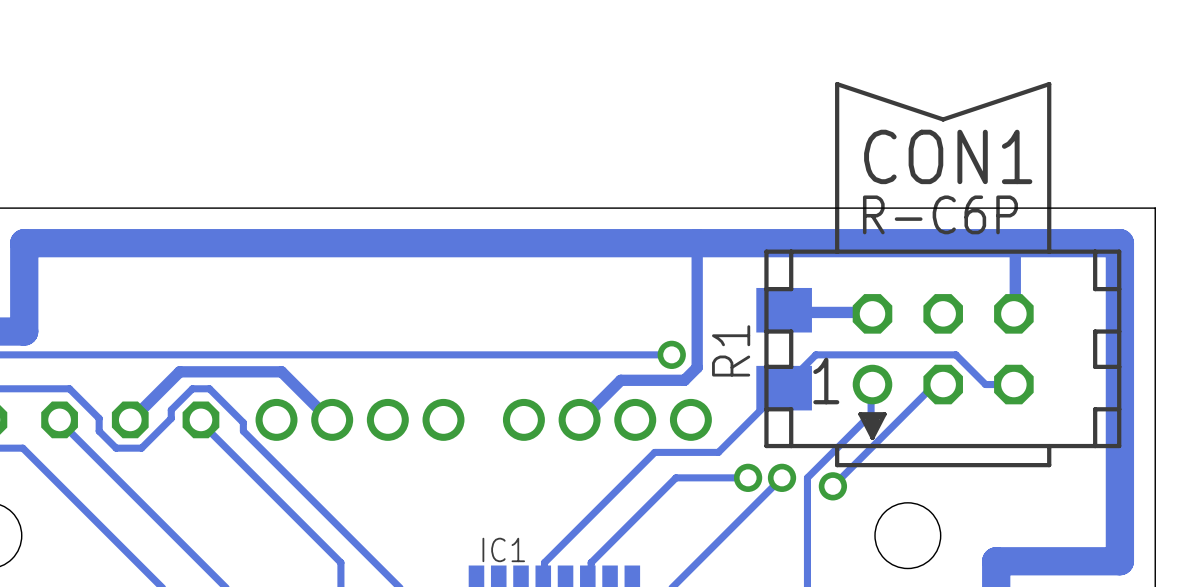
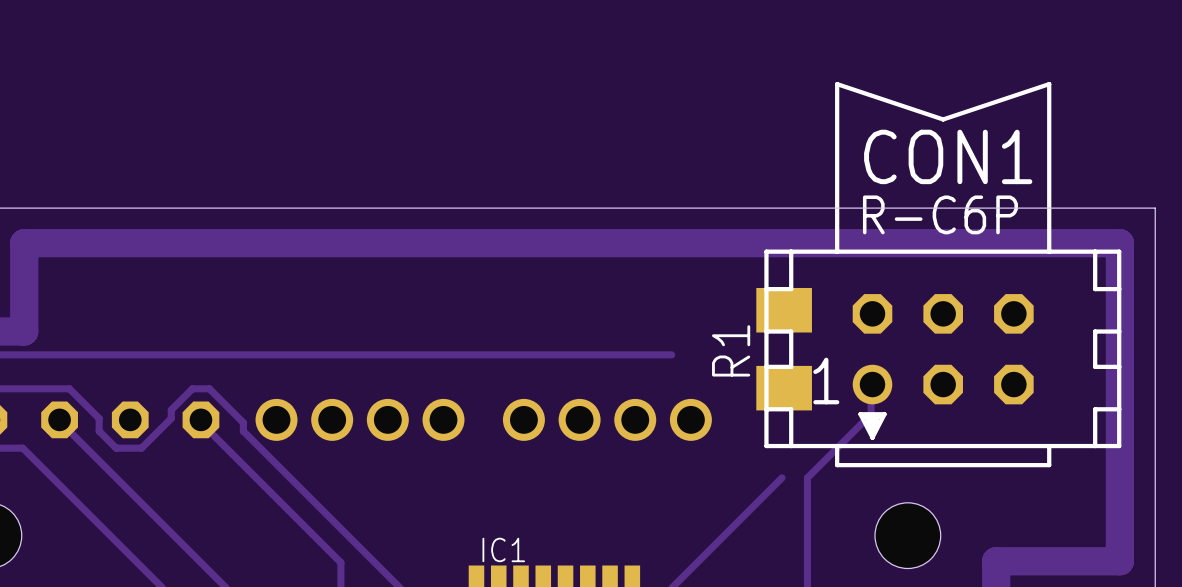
track: (697, 243) (697, 367) (684, 380) (620, 380) (579, 419) -> none
track: (1015, 243) (1013, 313) -> none
track: (784, 310) (786, 312) (872, 313) -> none
via: (671, 354) -> none
track: (943, 384) (934, 384) (832, 486) -> none
track: (1013, 384) (985, 384) (955, 354) (815, 354) (718, 452) (654, 452) (544, 562) (543, 583) -> none
track: (332, 419) (328, 418) (281, 371) (179, 371) (130, 419) -> none
track: (748, 477) (675, 477) (591, 562) (591, 579) (587, 583) -> none
via: (748, 477) -> none
via: (782, 477) -> none
via: (832, 486) -> none

